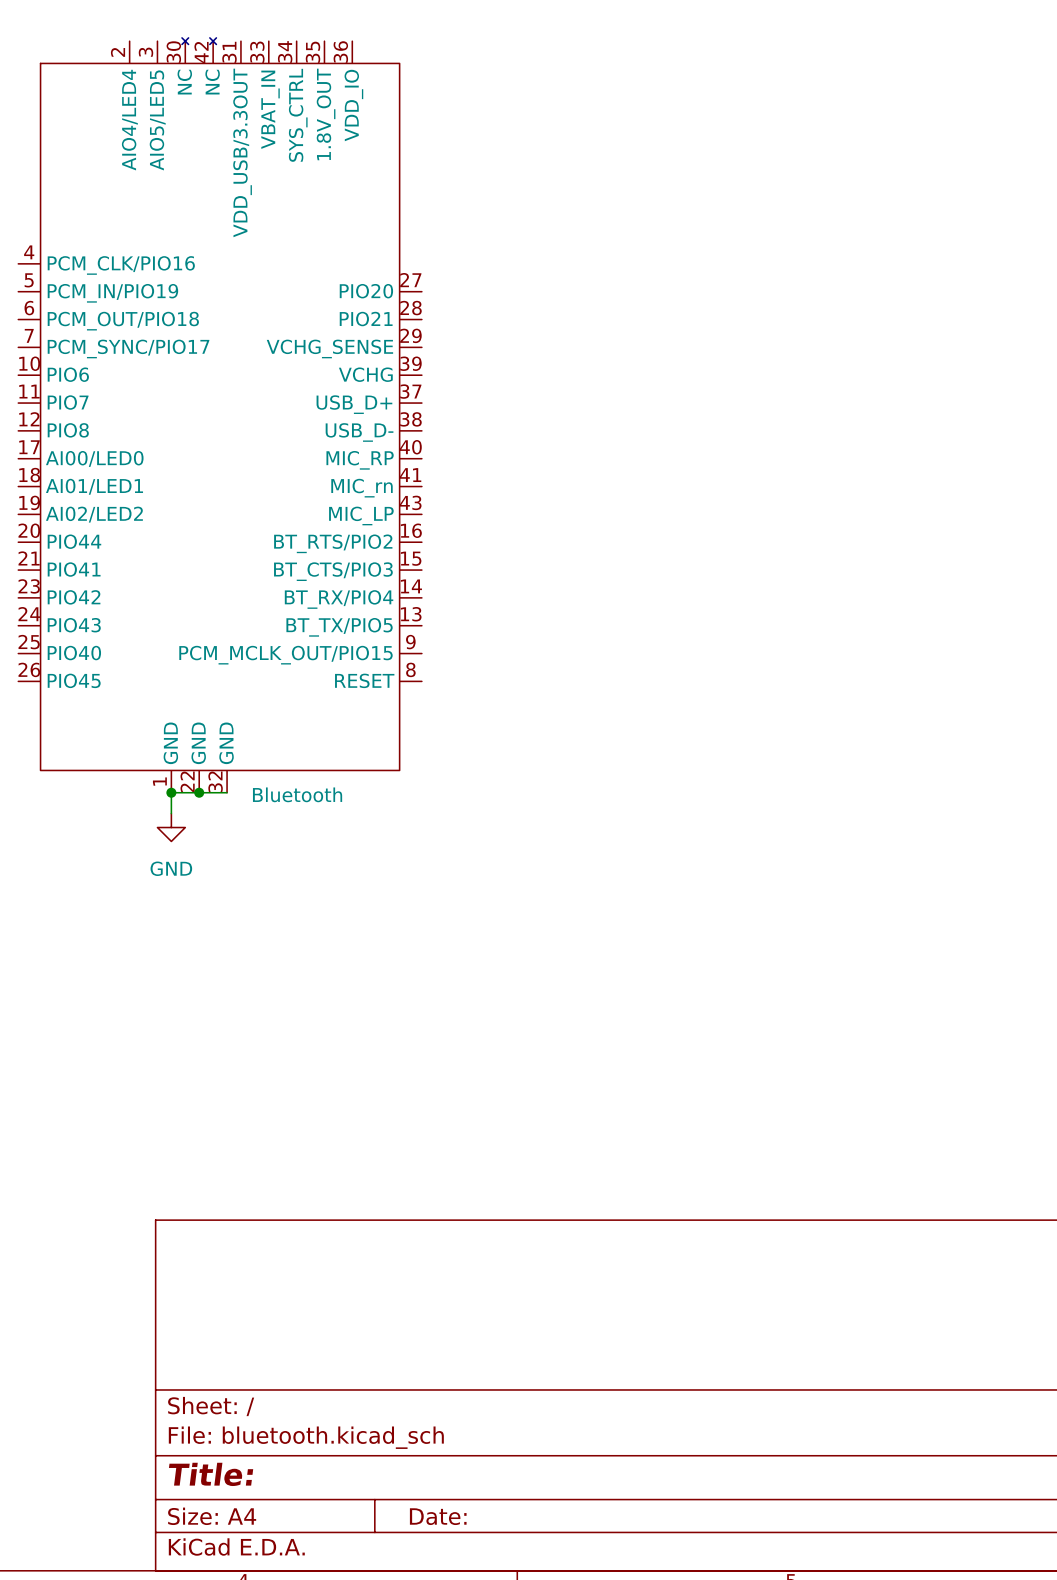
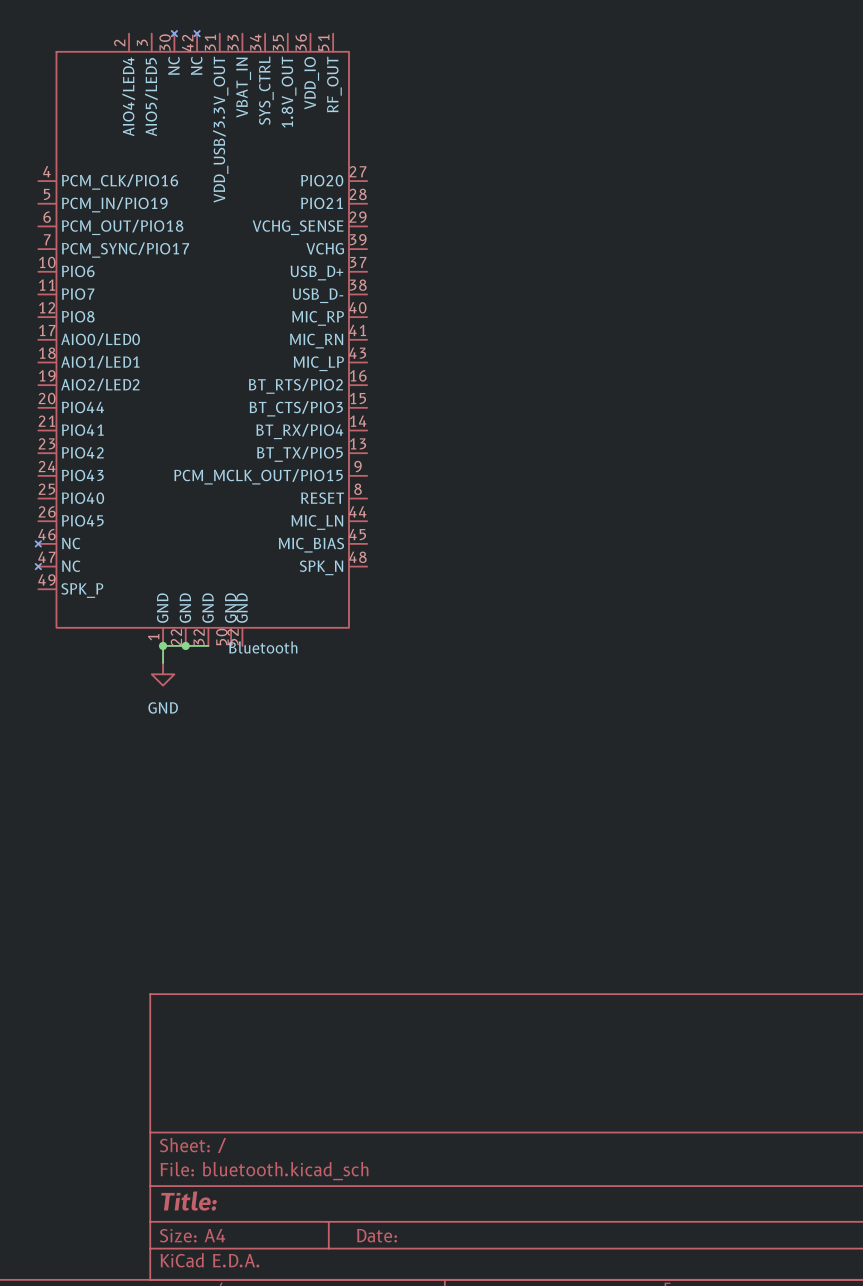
Bluetooth symbol: [18, 37, 422, 793] -> [35, 30, 368, 646]

